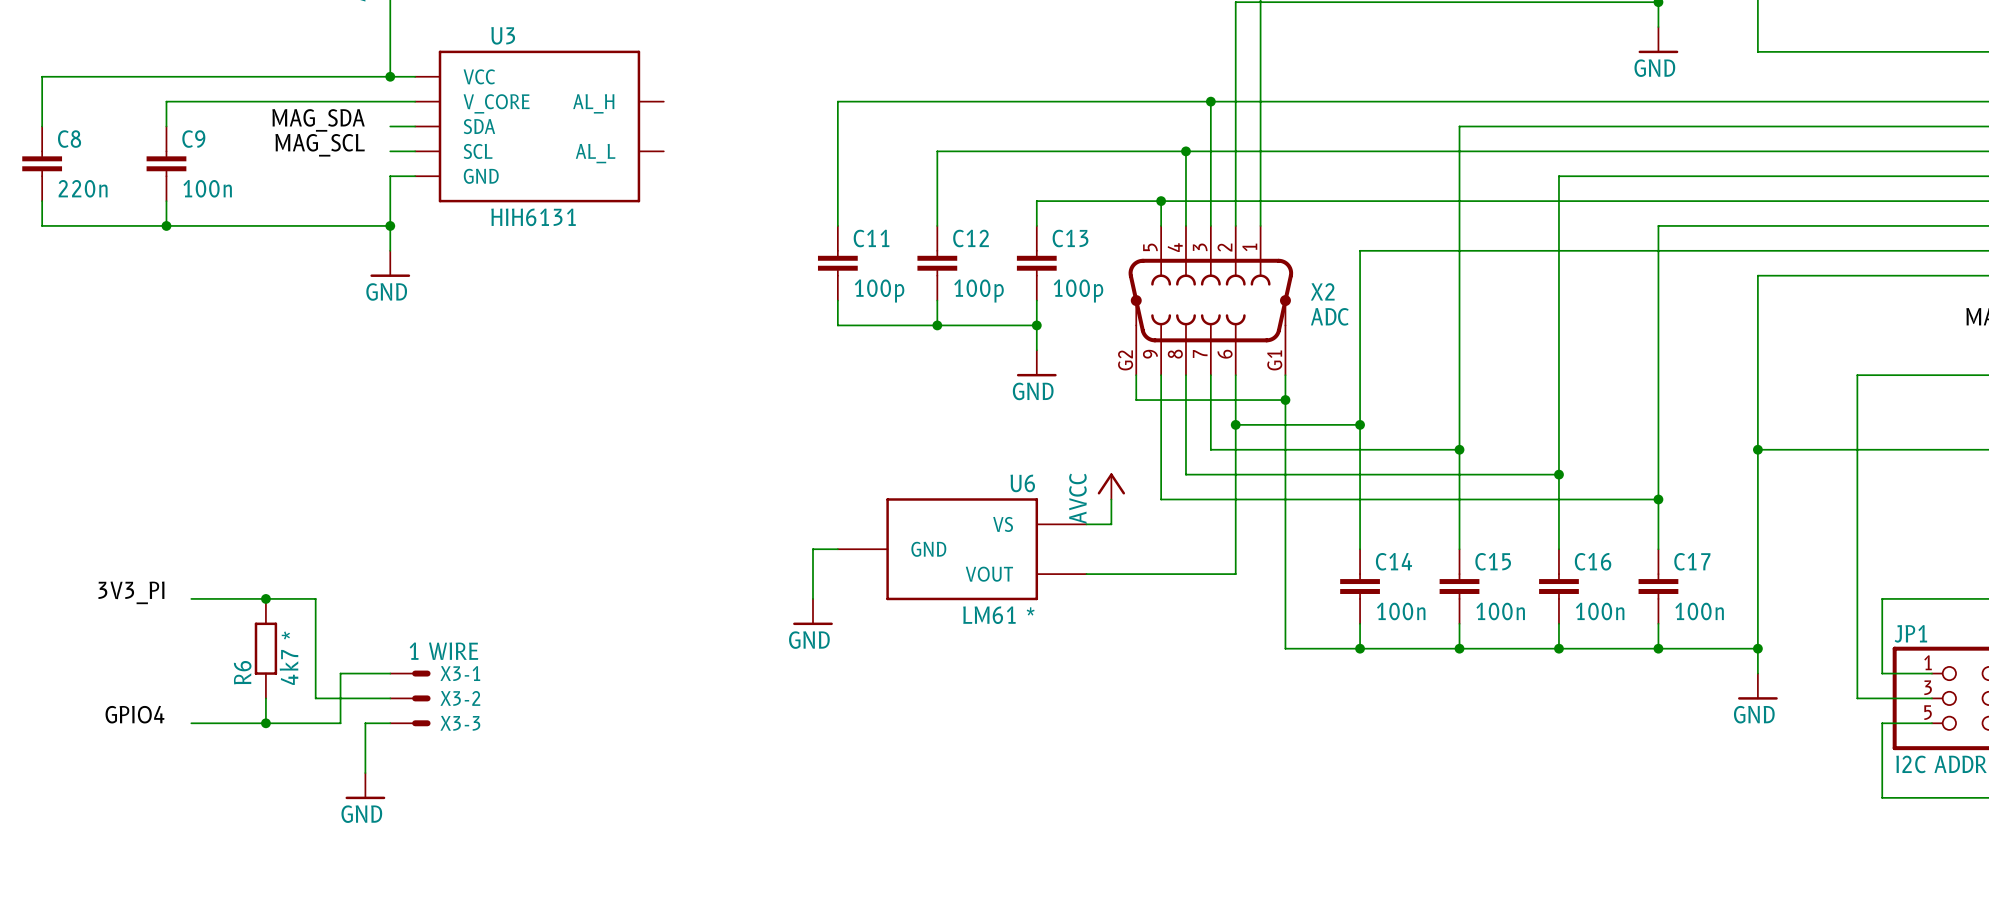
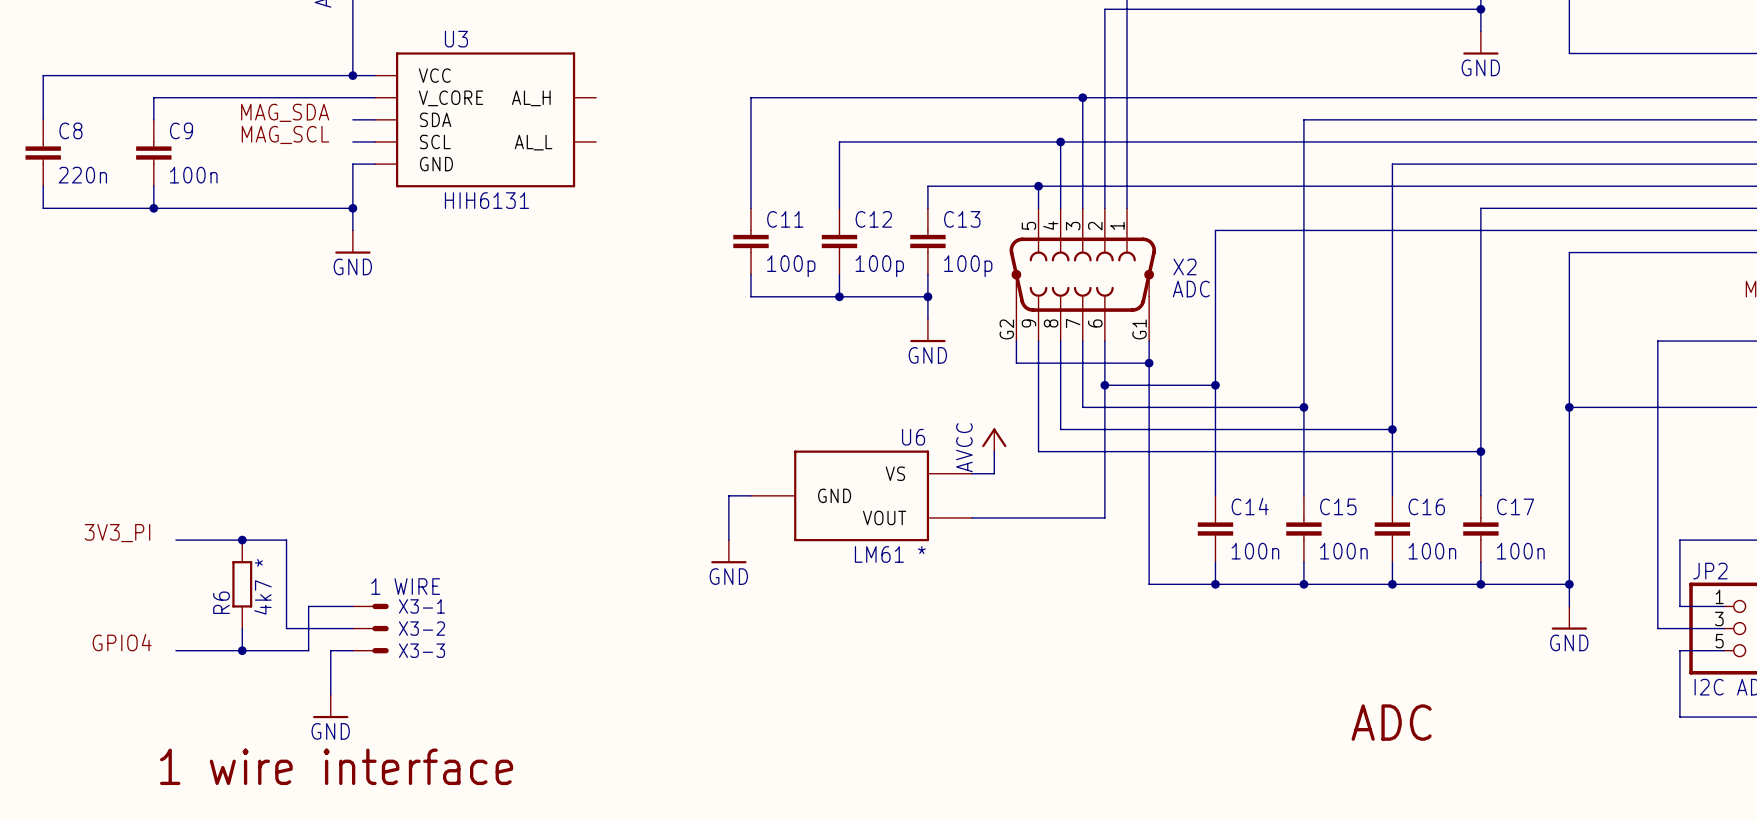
JP1 name: JP1 (1910, 633) -> JP2 (1710, 571)
text: none -> ADC (1391, 722)
text: none -> 1 wire interface (336, 766)

